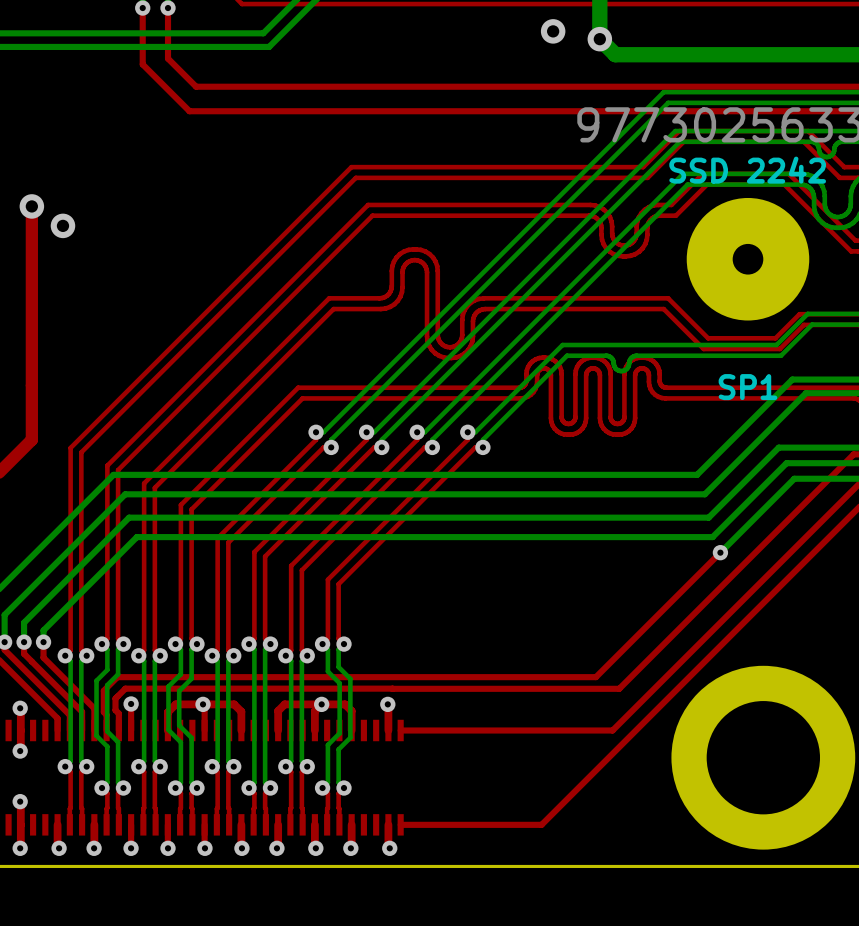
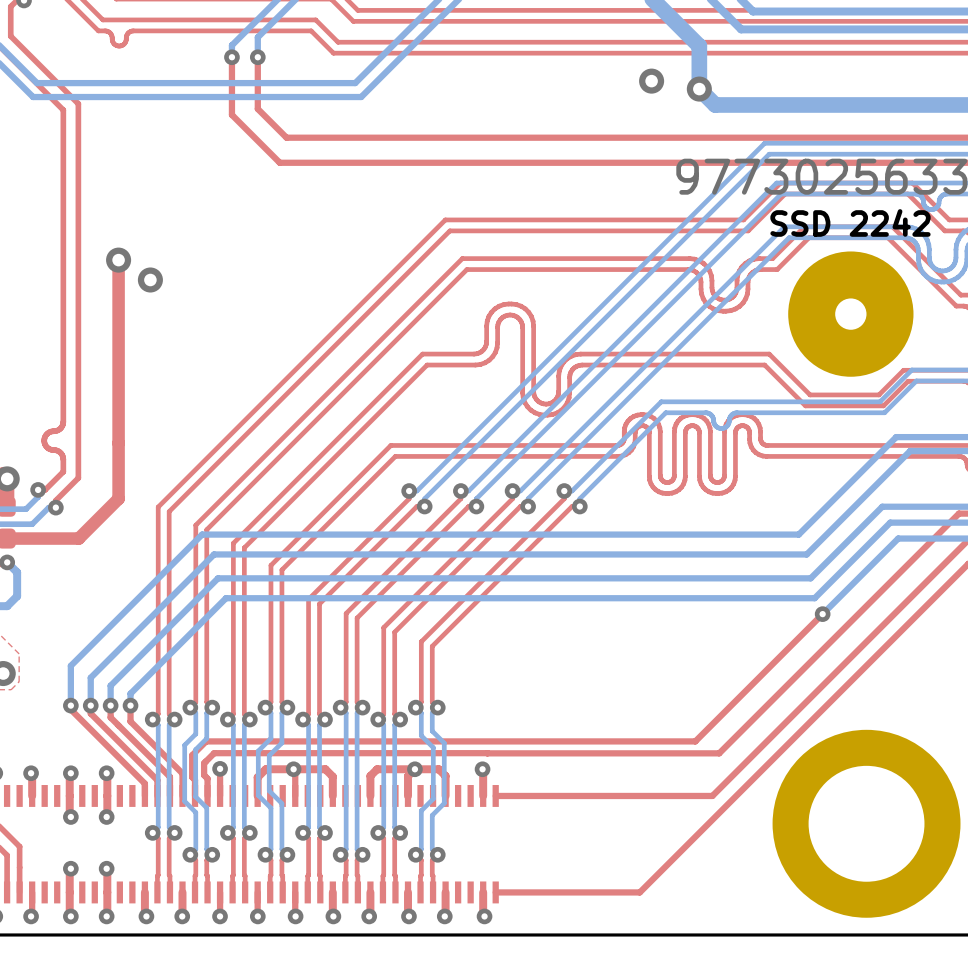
SP1 name: SP1 (747, 387) -> none

